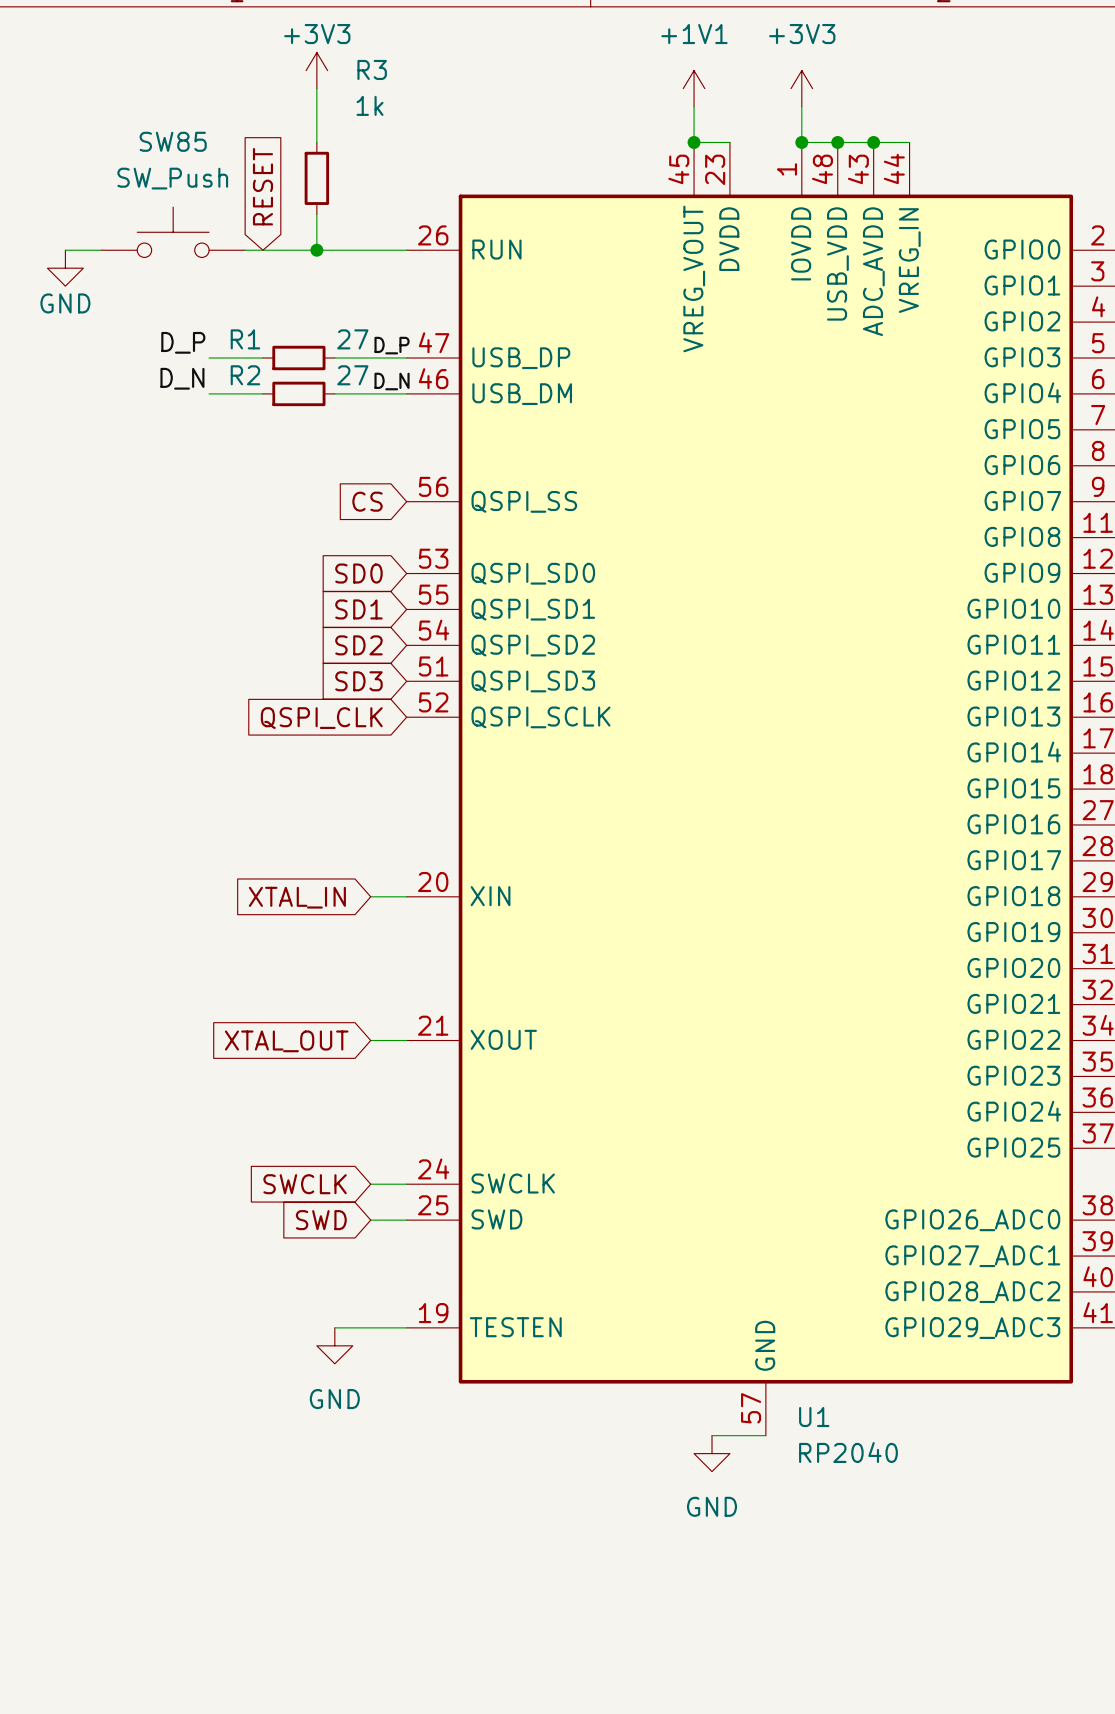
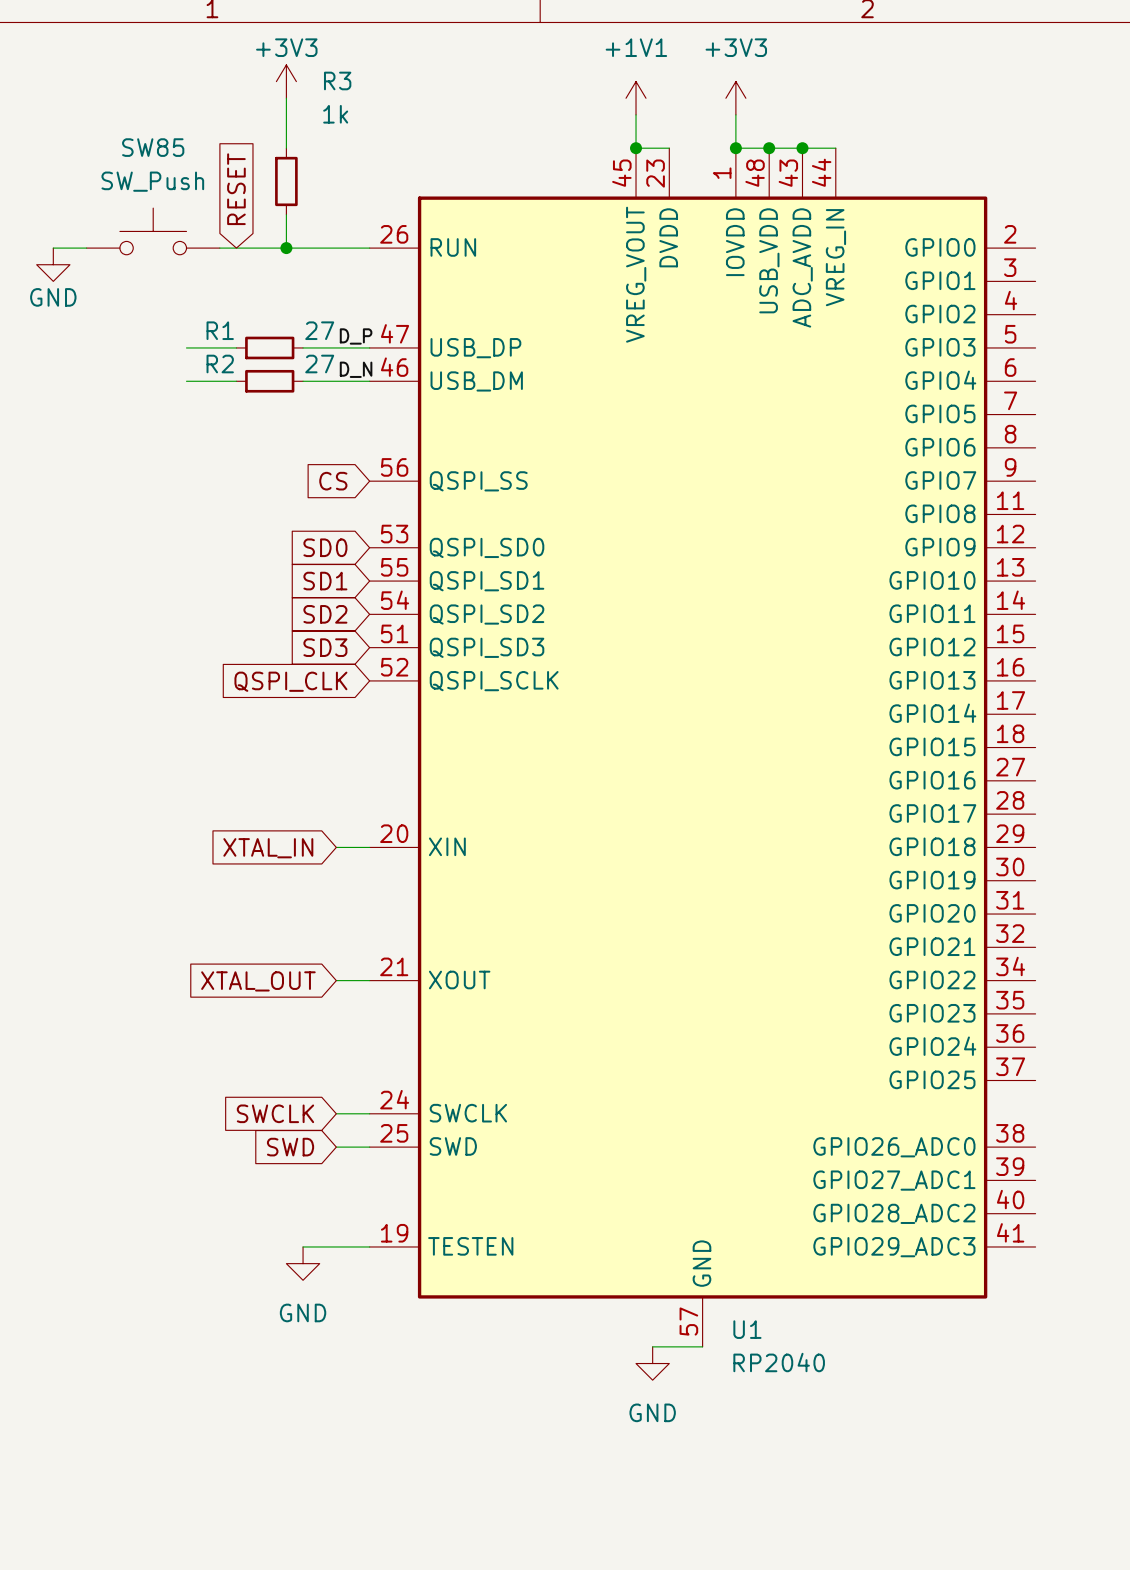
label: D_P (183, 342) -> none
label: D_N (182, 378) -> none

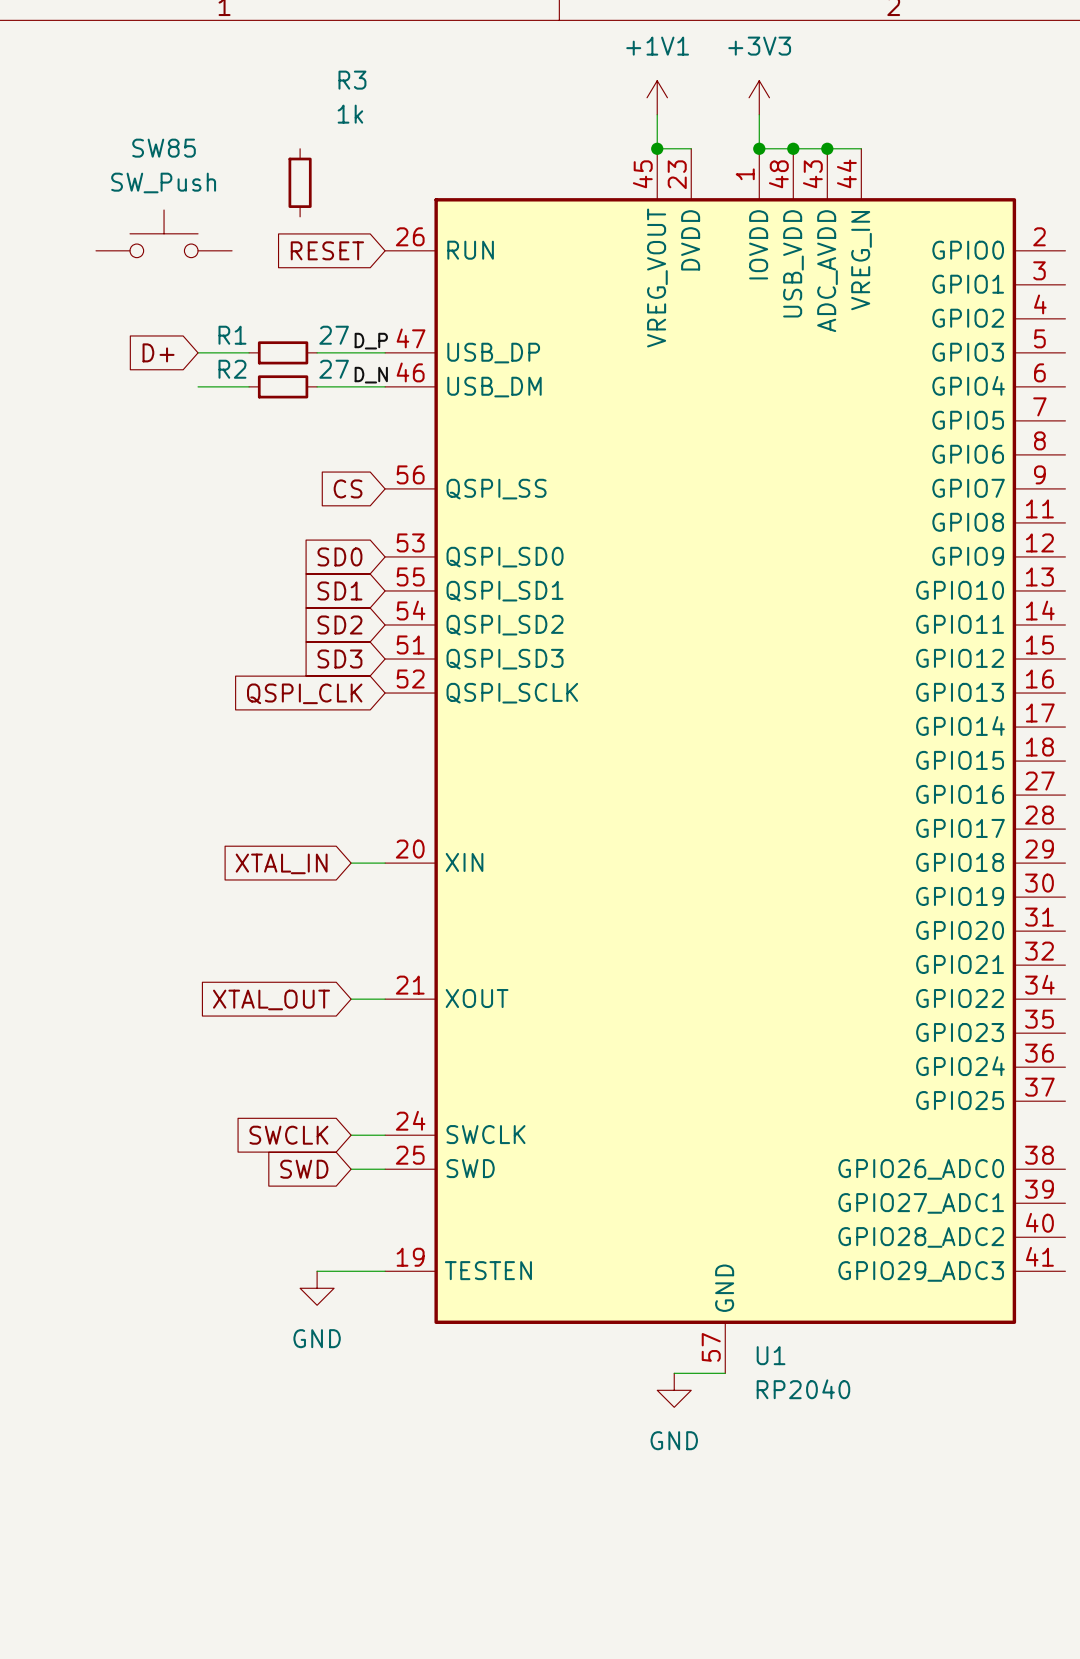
power symbol: +3V3 (286, 81) -> none
wire: (286, 98) (286, 148) -> none
global label rotation: 0° (236, 189) -> 90° counterclockwise (327, 250)
wire: (286, 214) (286, 248) -> none
wire: (53, 248) (86, 248) -> none
wire: (219, 248) (369, 248) -> none
junction: (286, 248) -> none
power symbol: GND (53, 264) -> none
global label: none -> D+ (158, 352)

